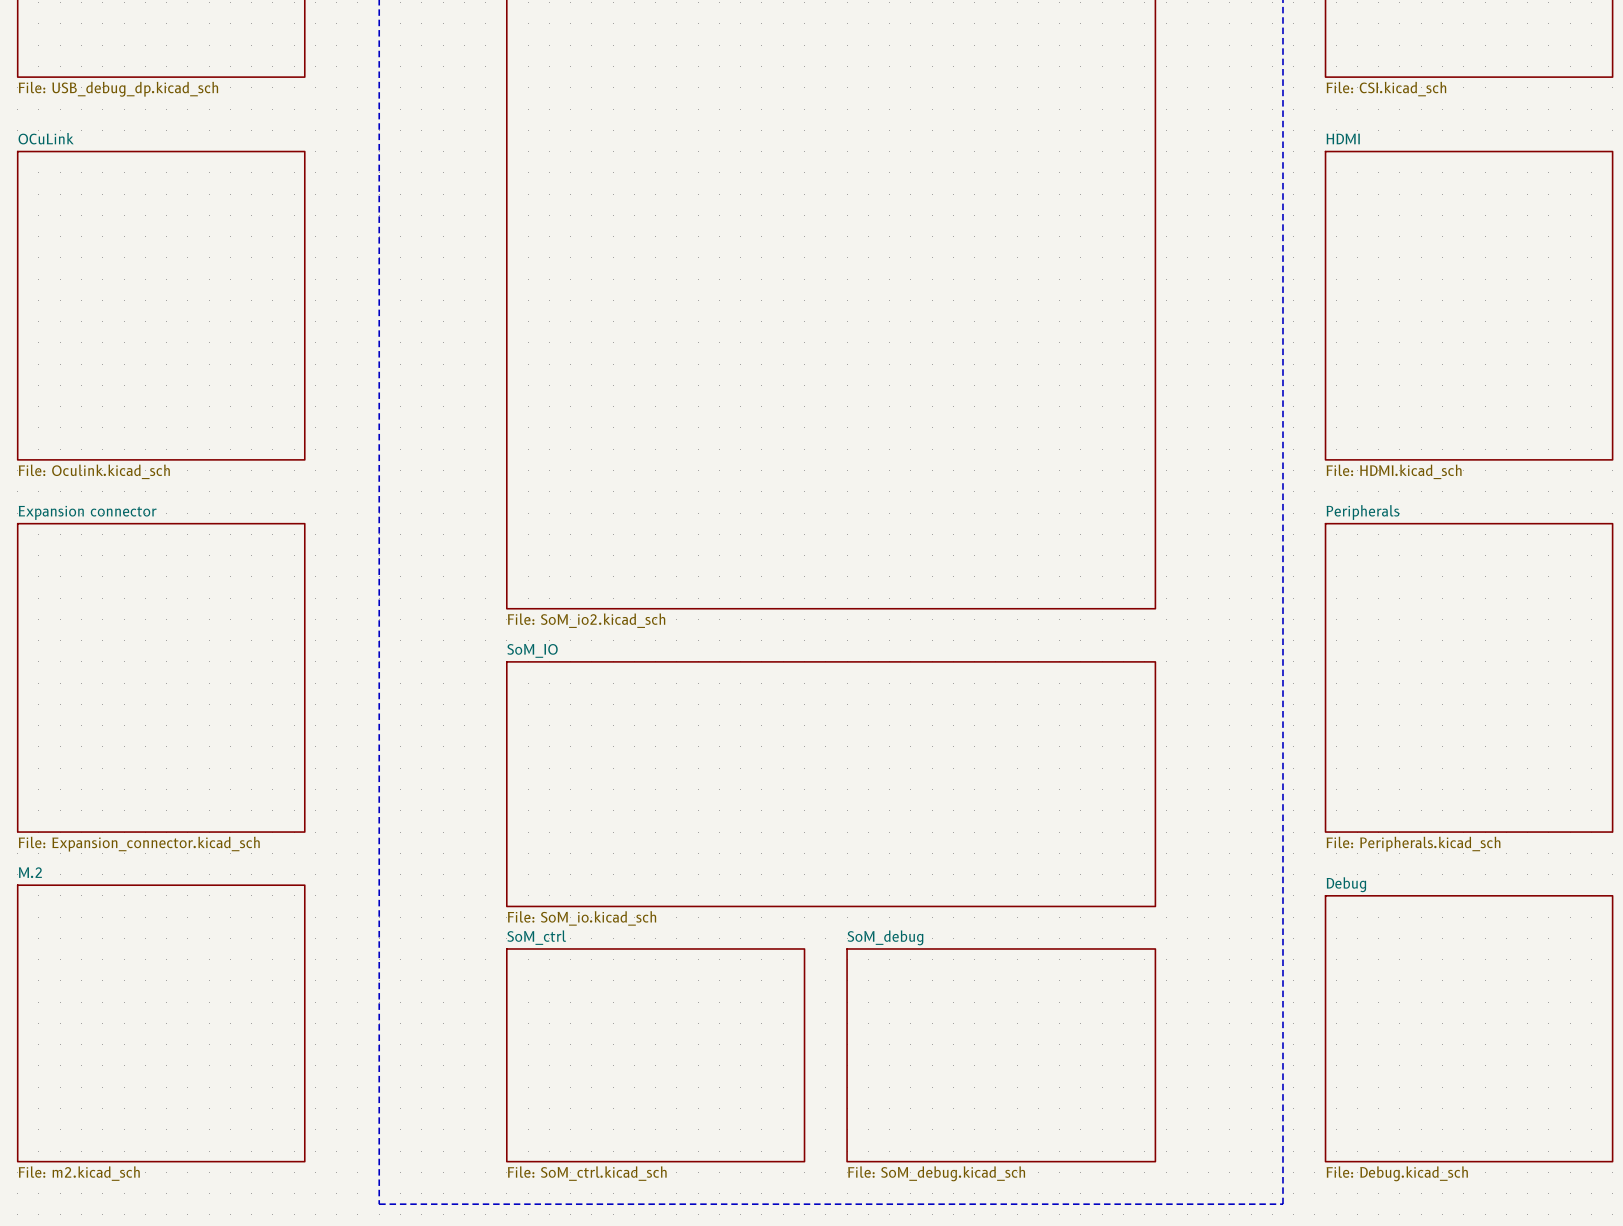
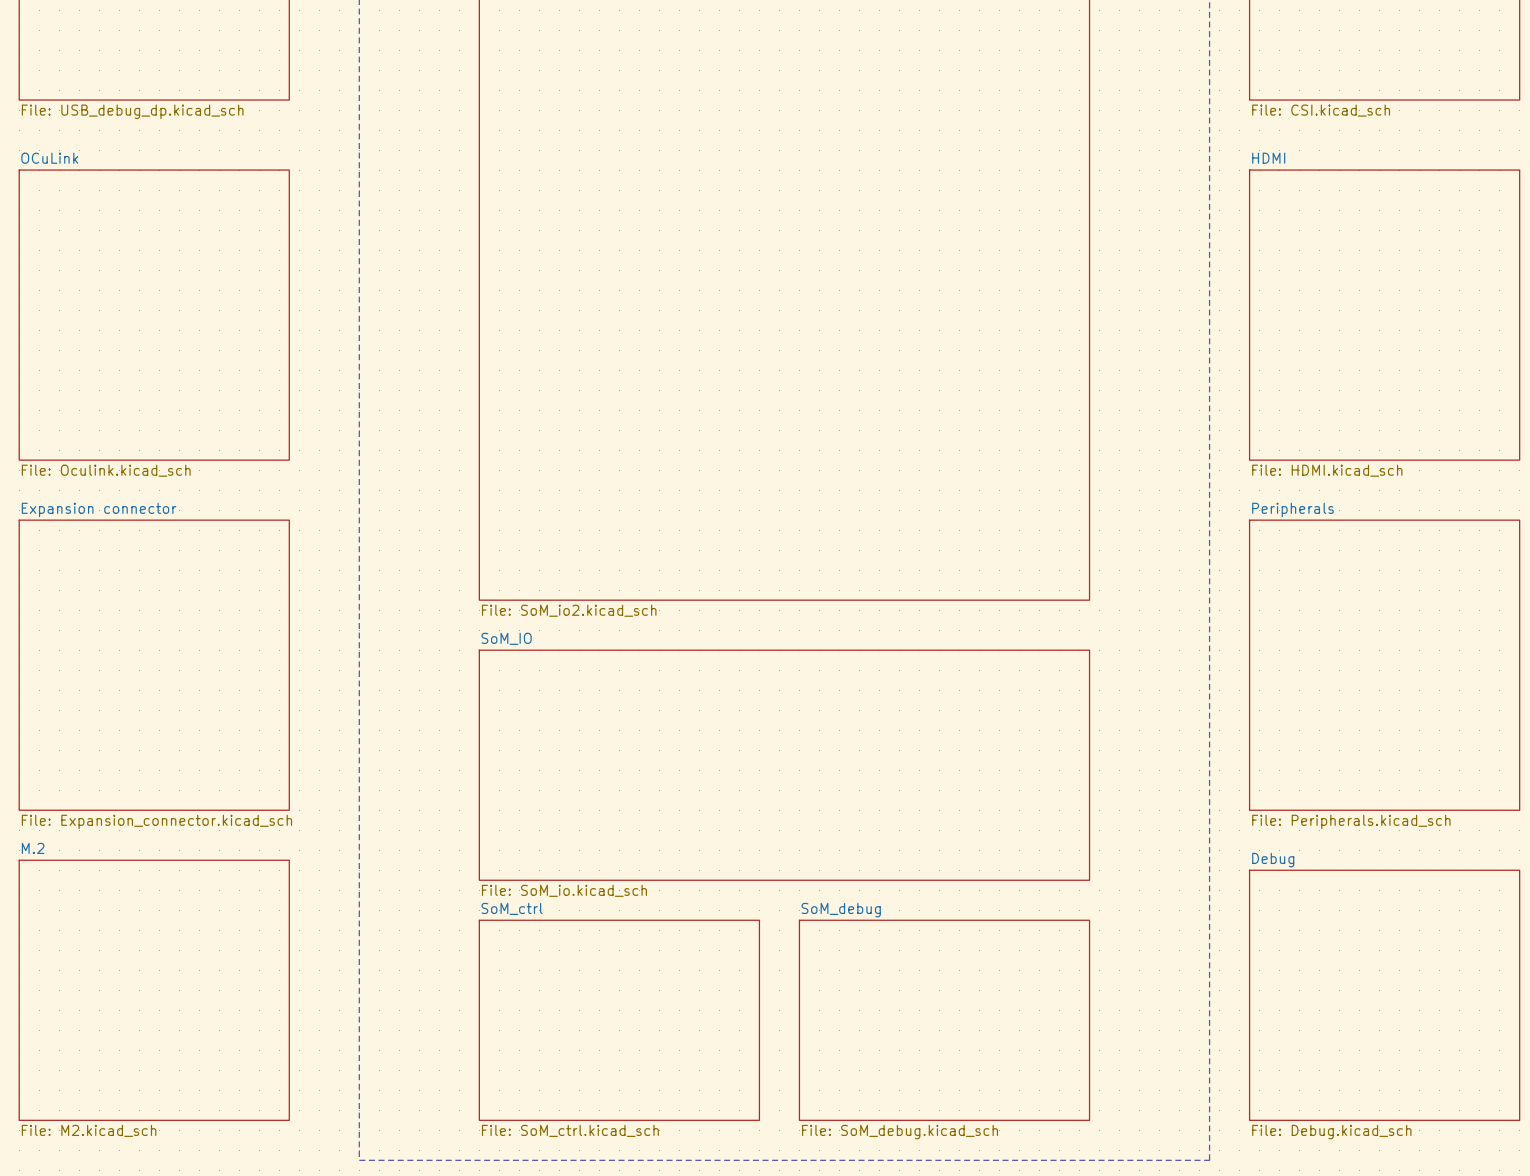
sheet M.2 value: File: m2.kicad_sch (79, 1173) -> File: M2.kicad_sch (89, 1130)

